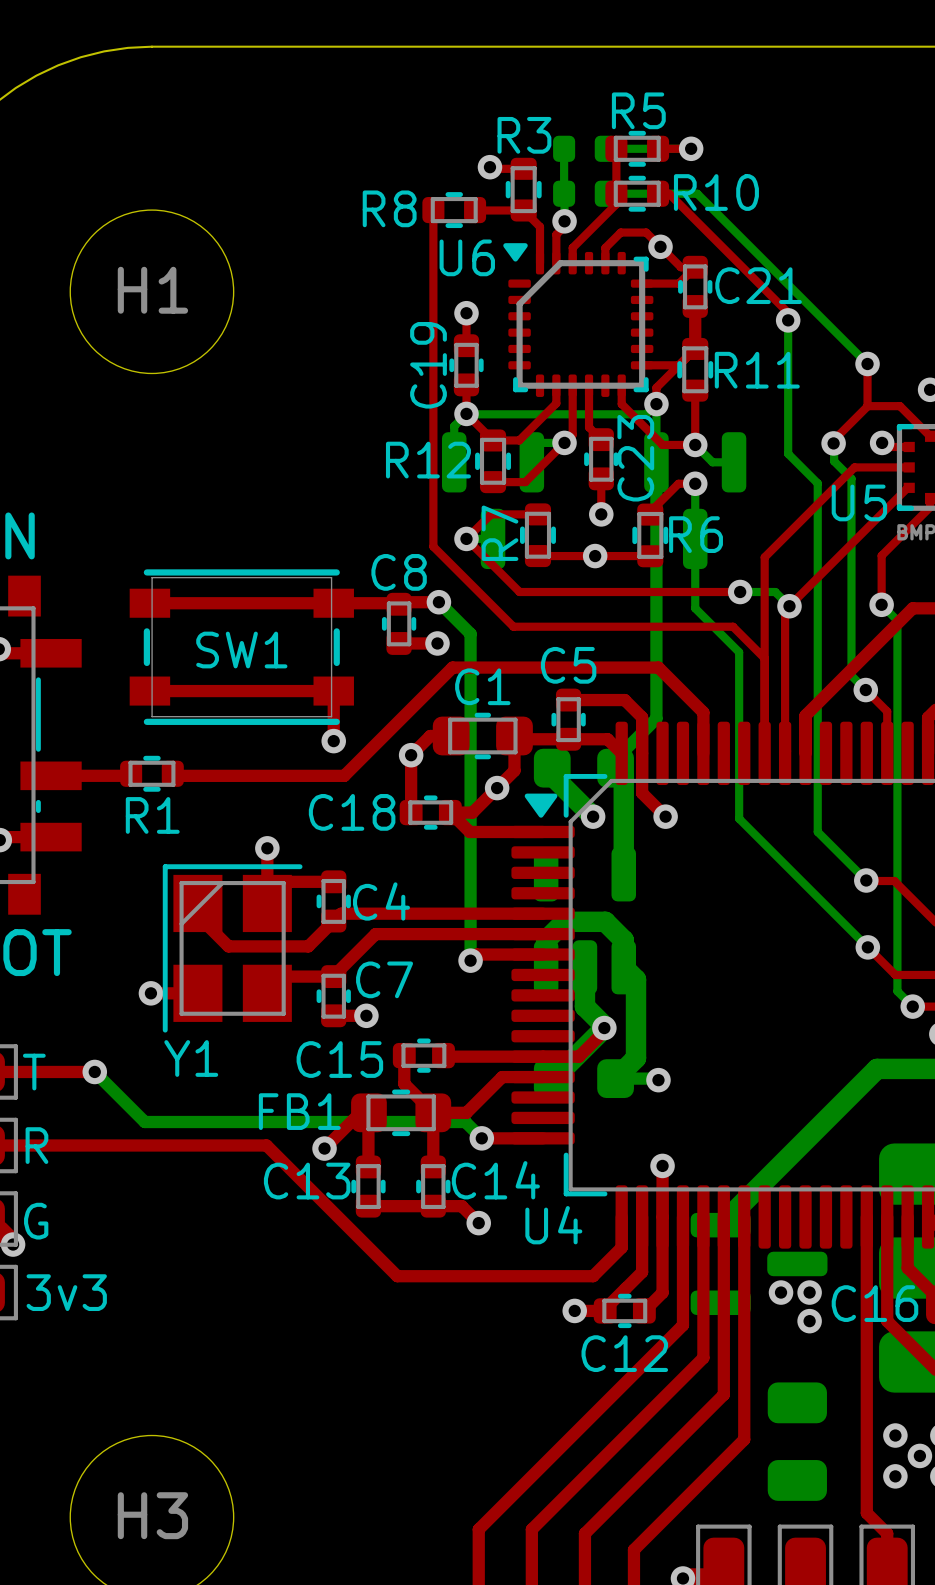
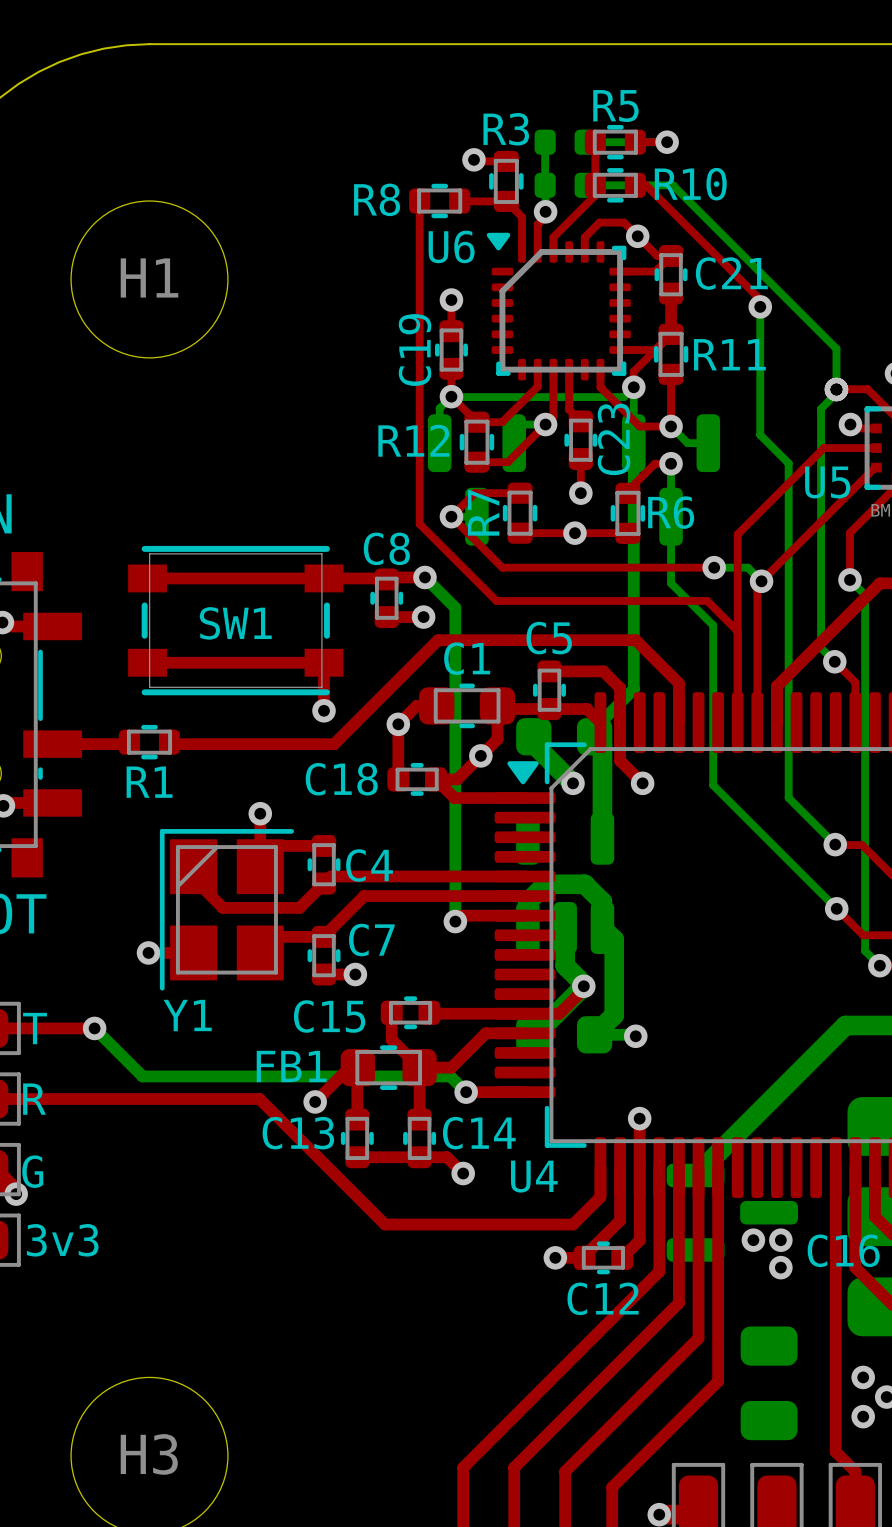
top track: (867, 363) (867, 405) -> none
via: (867, 363) -> none
top track: (867, 406) (833, 440) (833, 443) -> none
via: none -> (836, 389)
via: (833, 443) -> none
bottom track: (834, 443) (834, 461) (851, 478) -> (836, 348) (836, 393) (821, 408) (821, 458)

